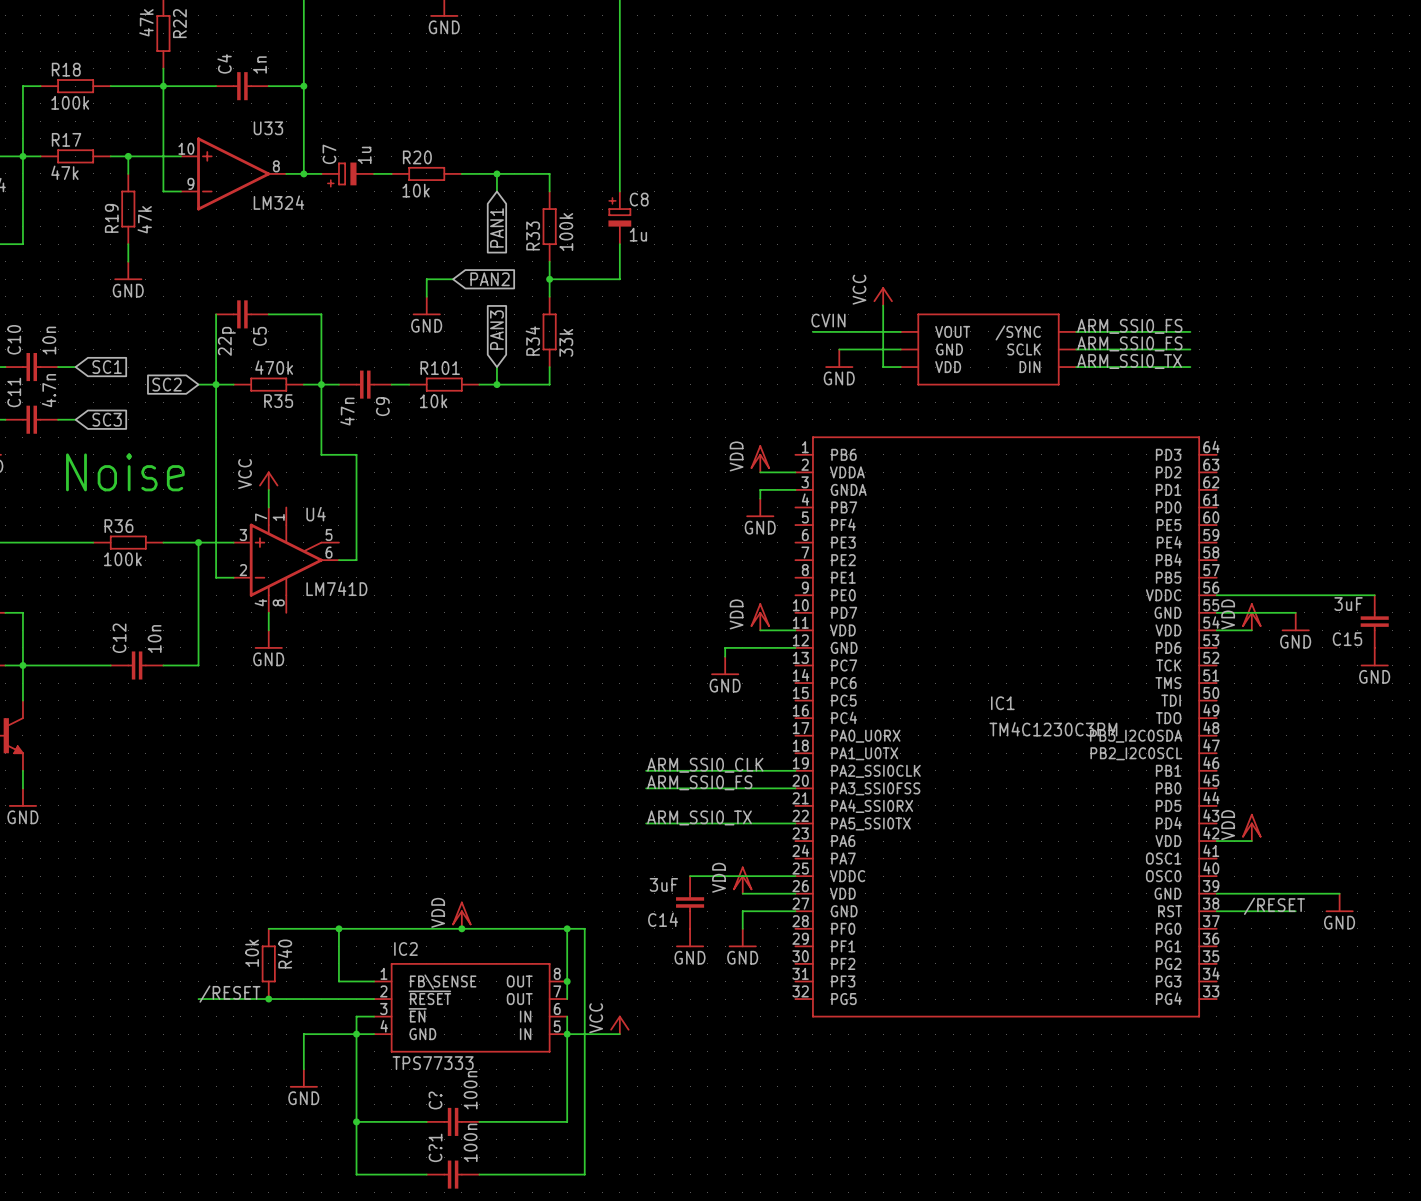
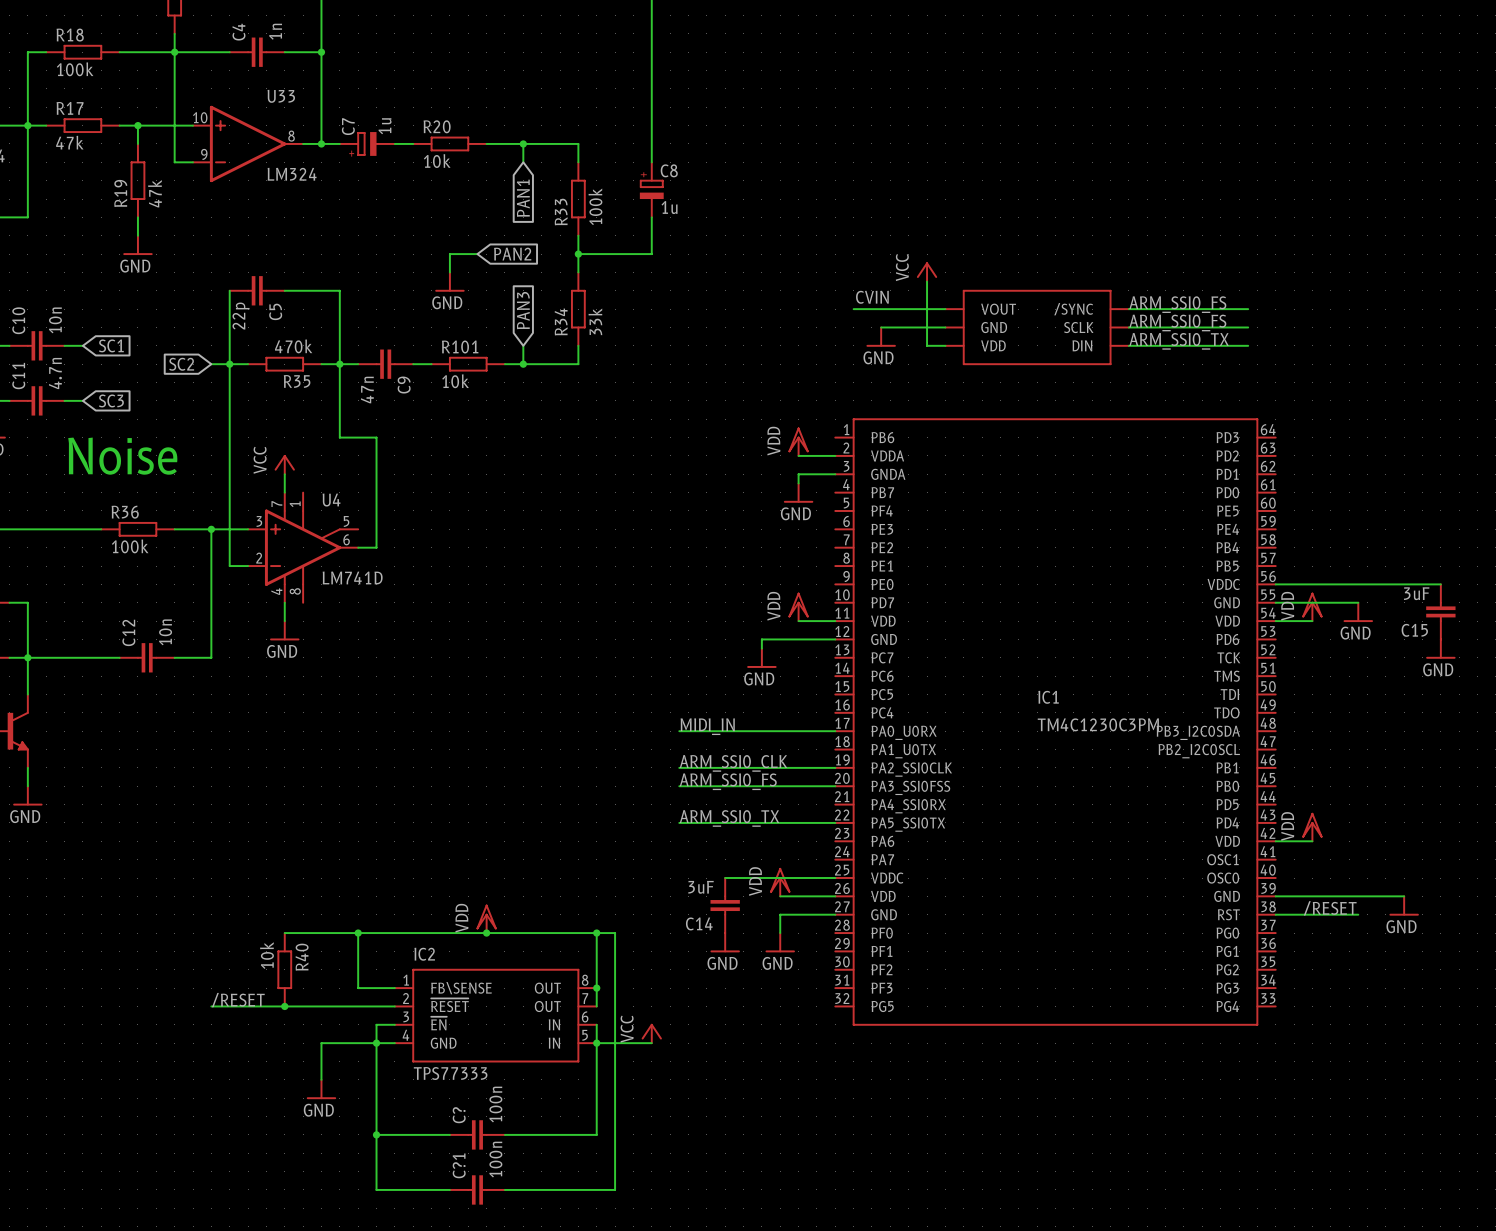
label: none -> MIDI_IN (707, 726)
wire: none -> (679, 731) (835, 731)

